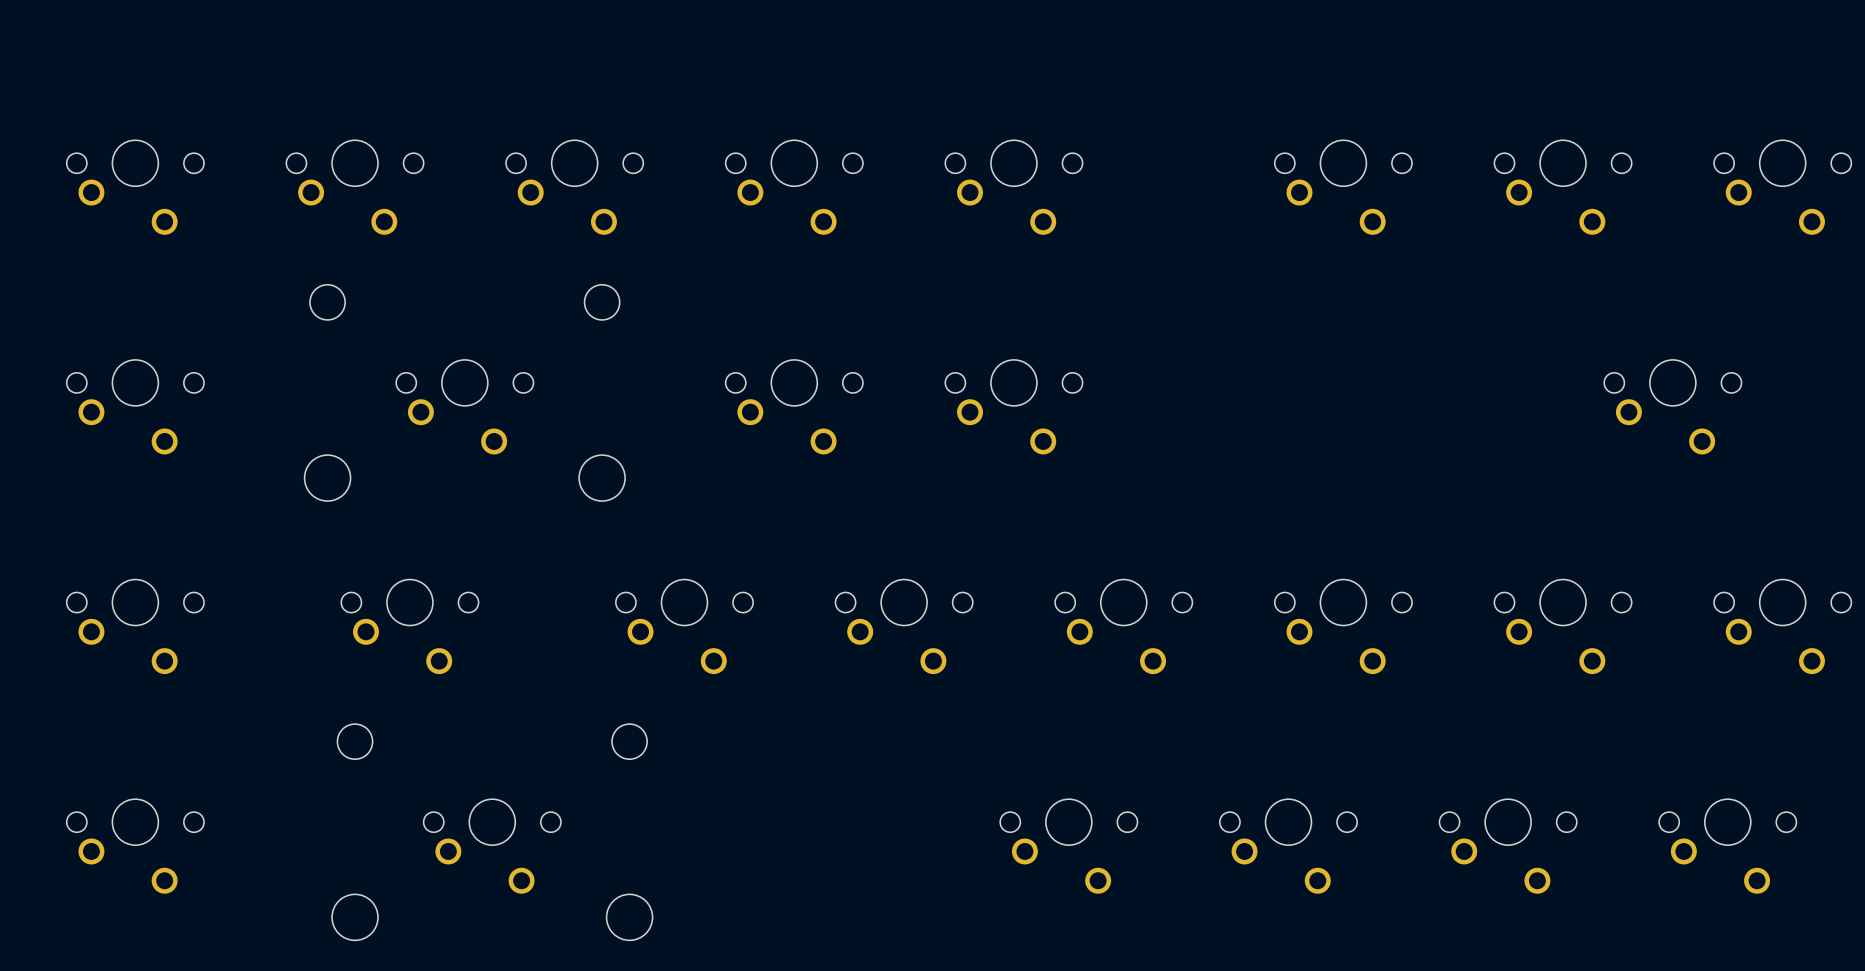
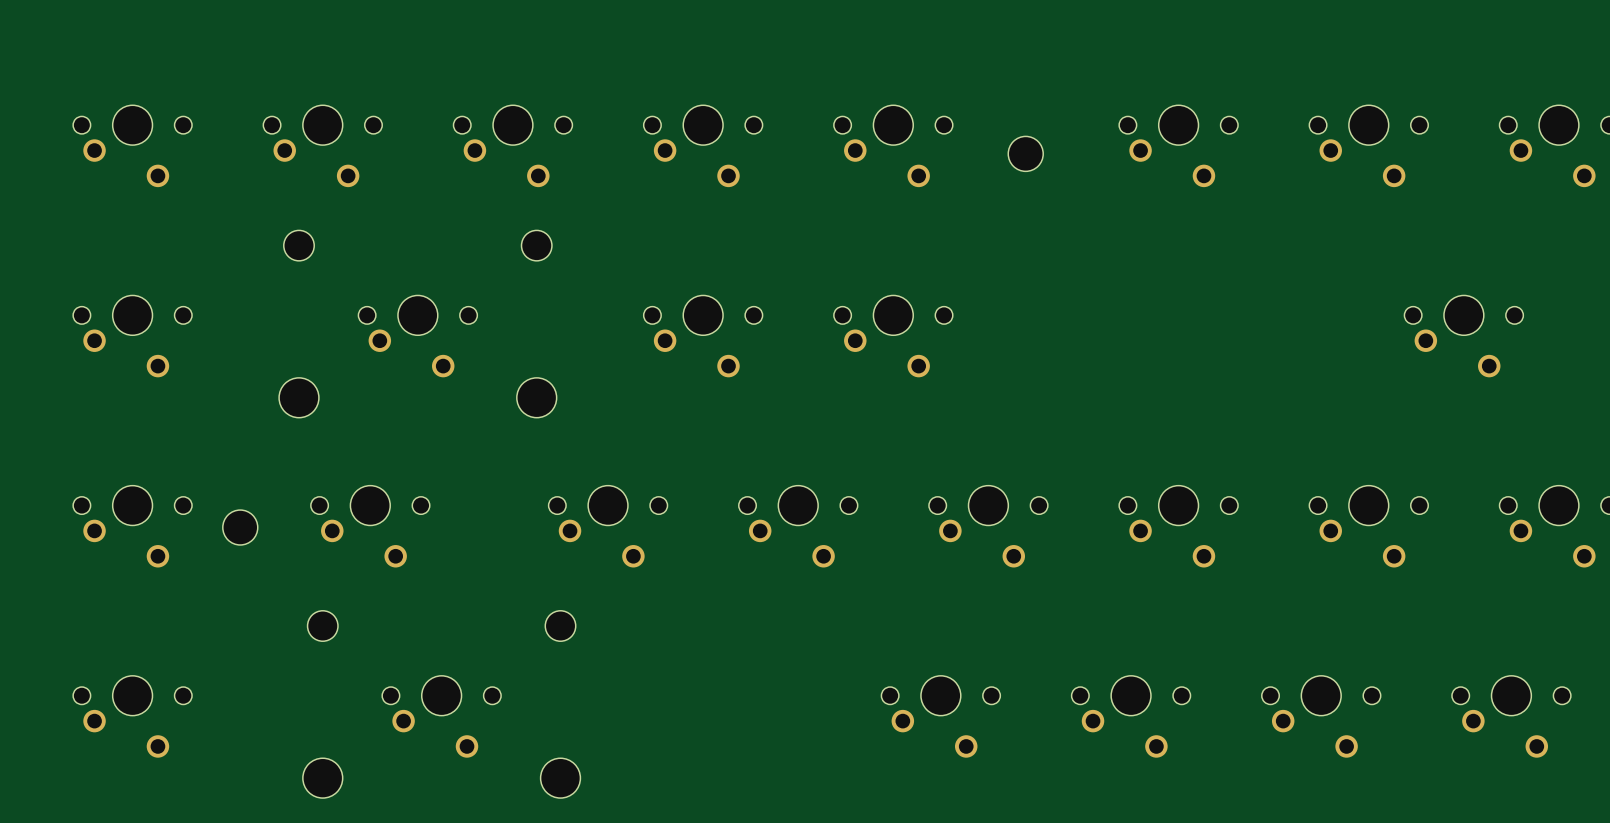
part: none -> (1025, 153)
part: none -> (240, 527)

